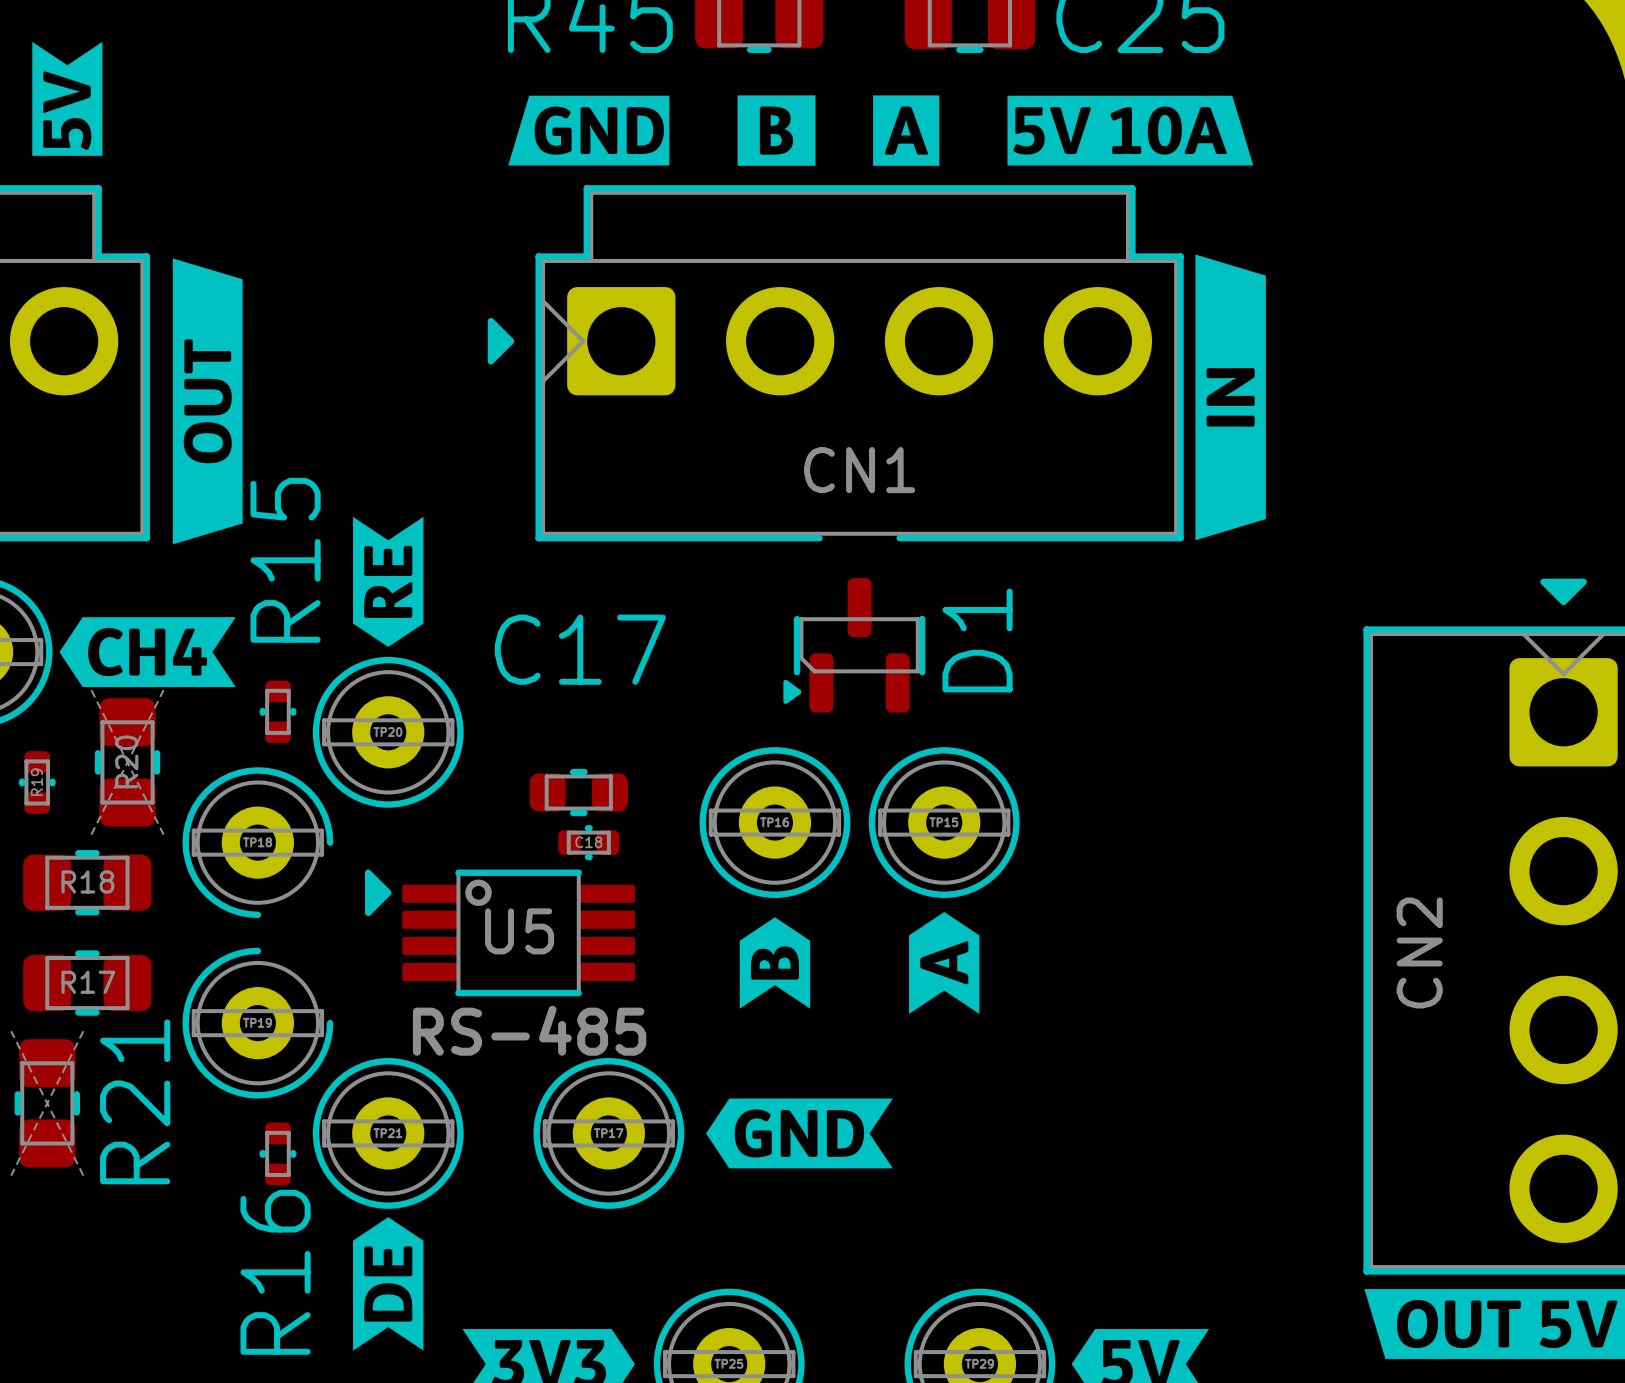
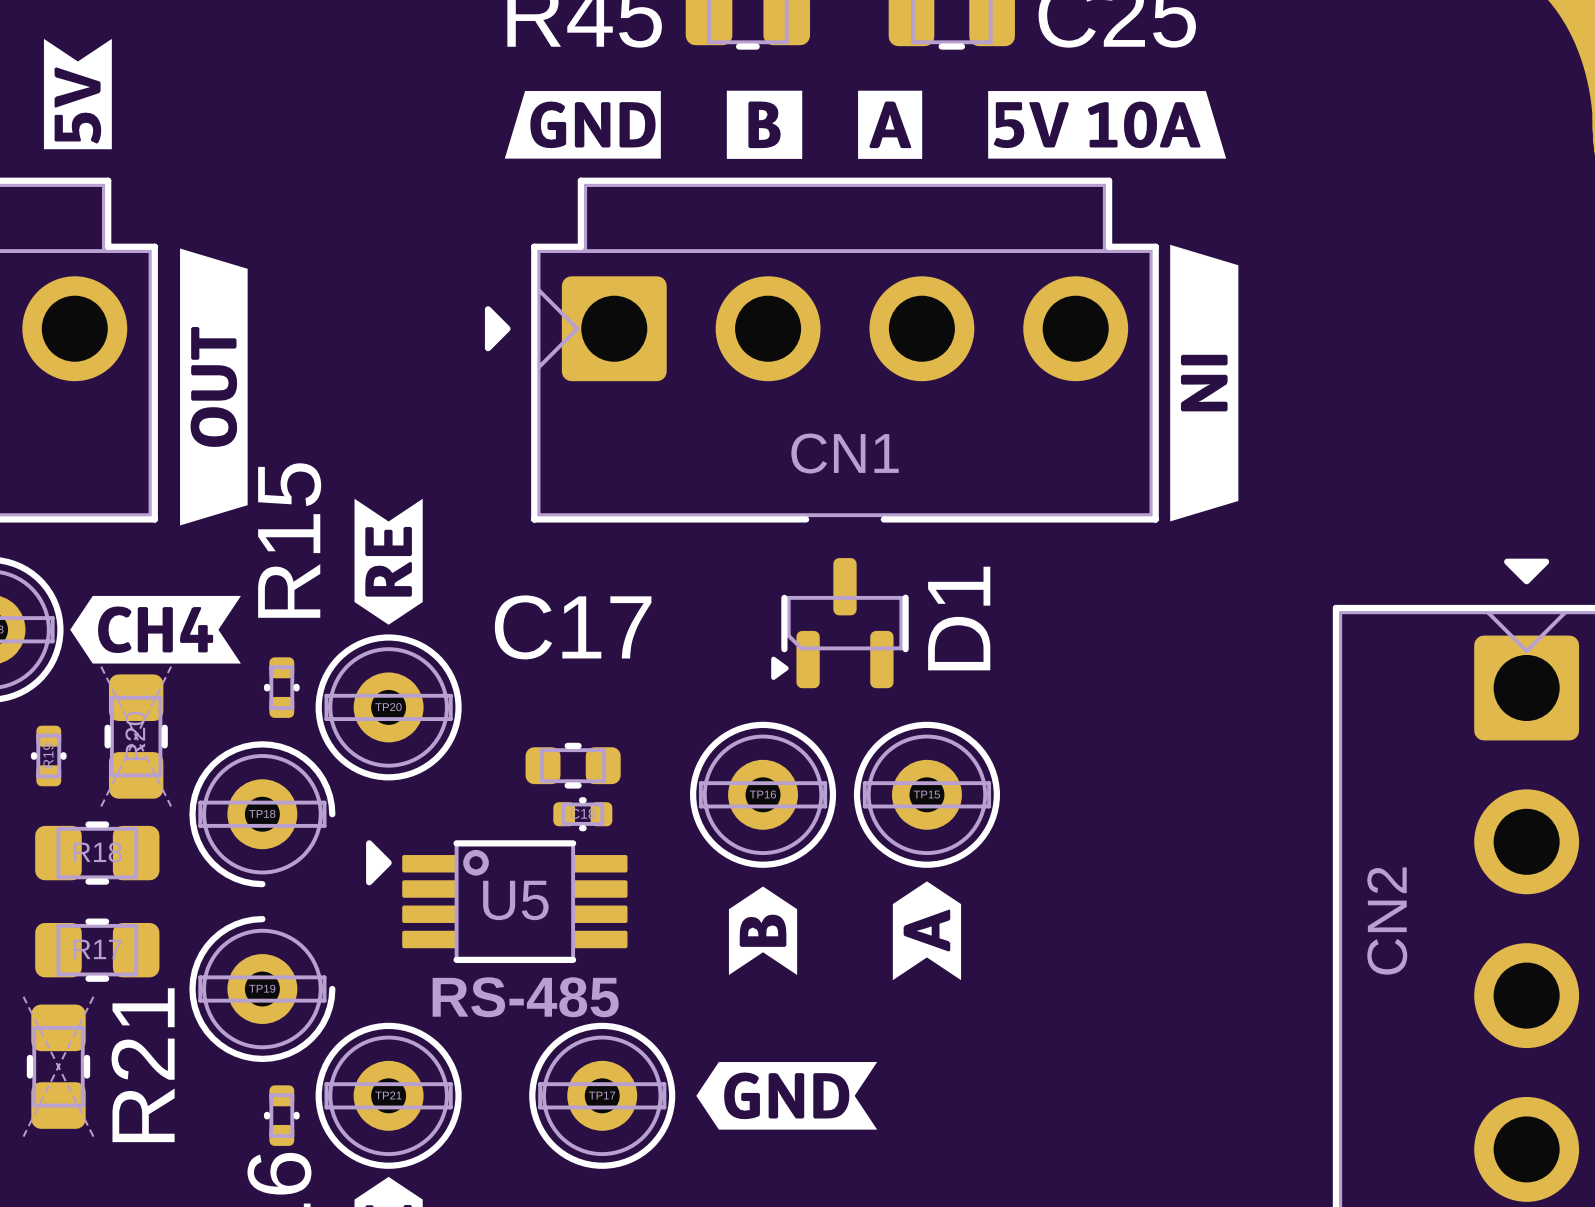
drawing shape: [1195, 254, 1266, 541] -> [1170, 244, 1239, 522]

